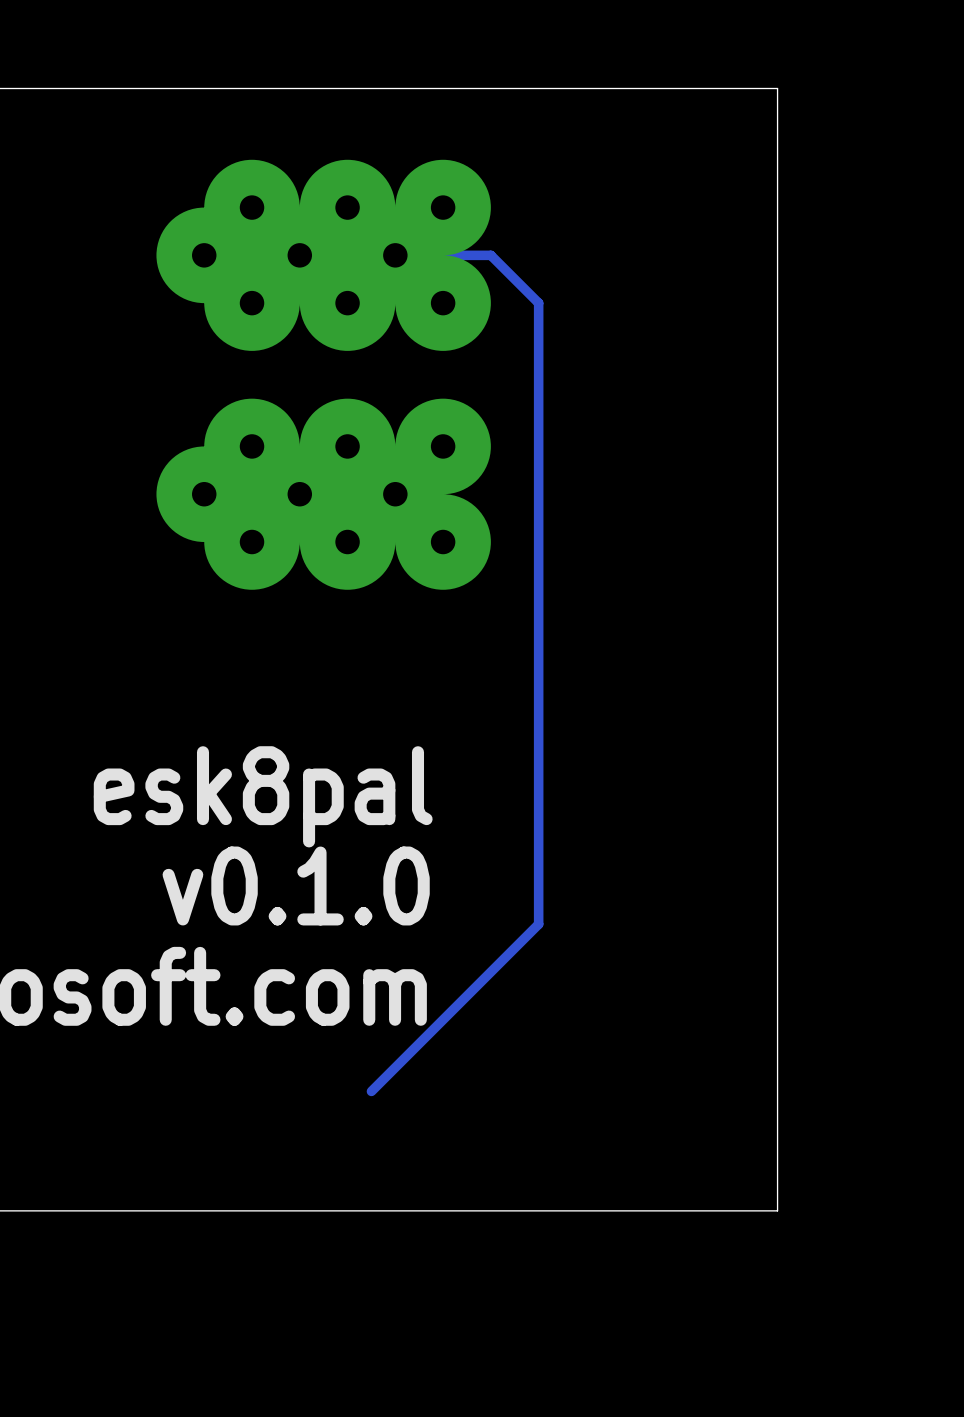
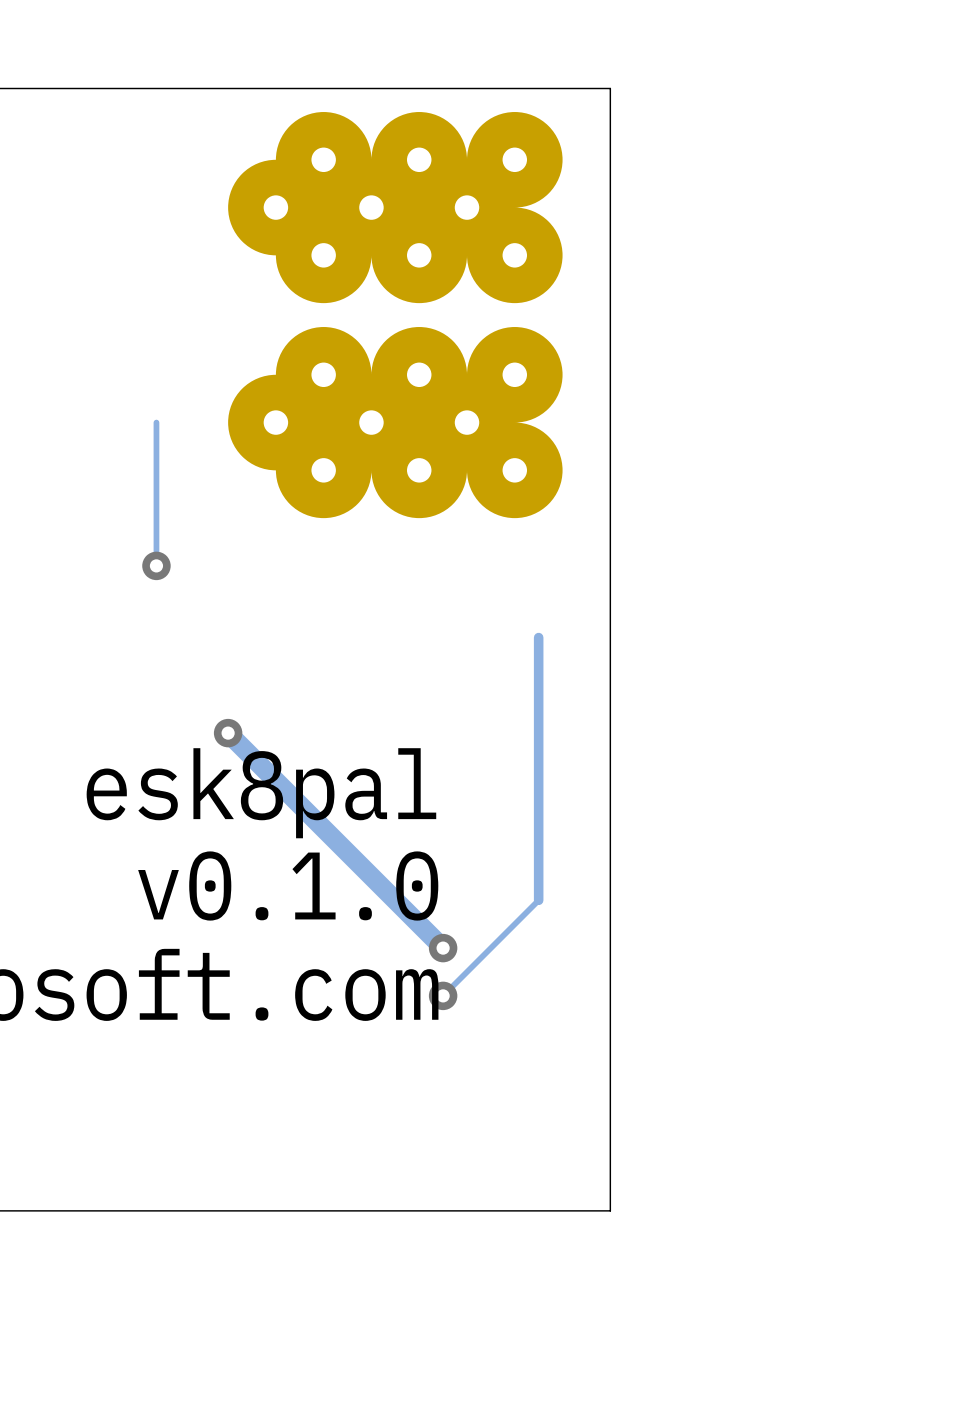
board edge: (610, 88) (777, 88) (777, 1210) (610, 1210) -> (610, 88) (610, 1210)
part position: (323, 255) -> (395, 207)
track: (395, 255) (490, 255) (538, 303) (538, 637) -> none
track: none -> (156, 422) (156, 565)
part: none -> (395, 422)
part: (323, 494) -> none
via: none -> (156, 565)
track: none -> (228, 733) (443, 948)
via: none -> (228, 733)
track: (538, 900) (538, 924) (371, 1091) -> (538, 900) (443, 995)
via: none -> (443, 948)
via: none -> (443, 995)

